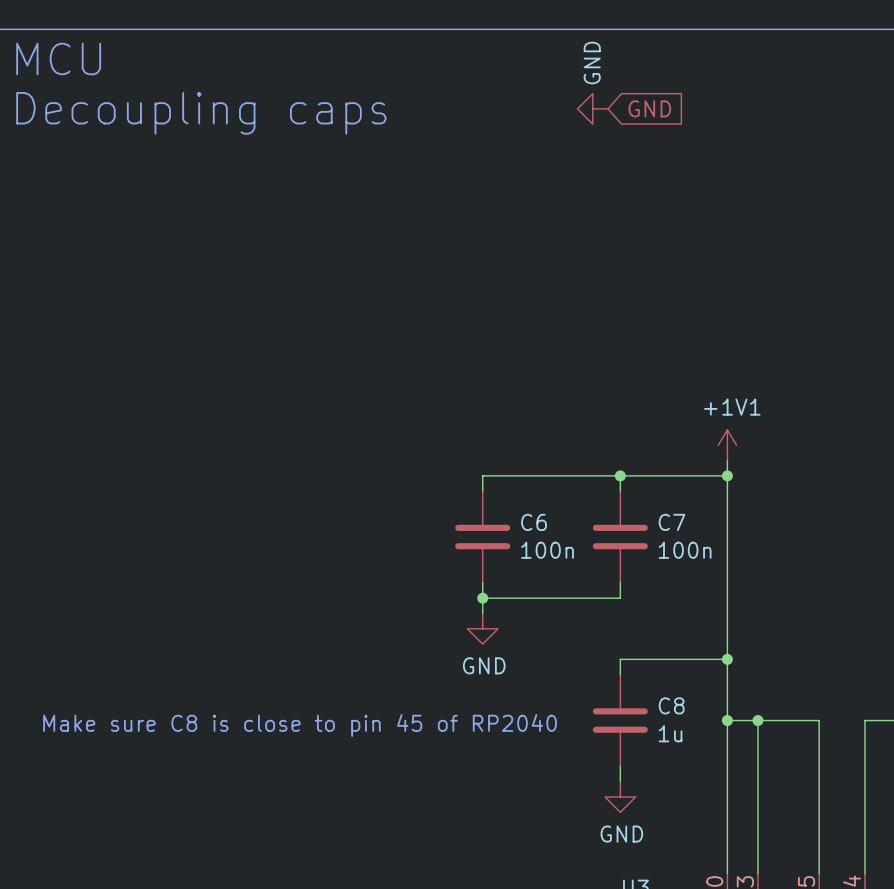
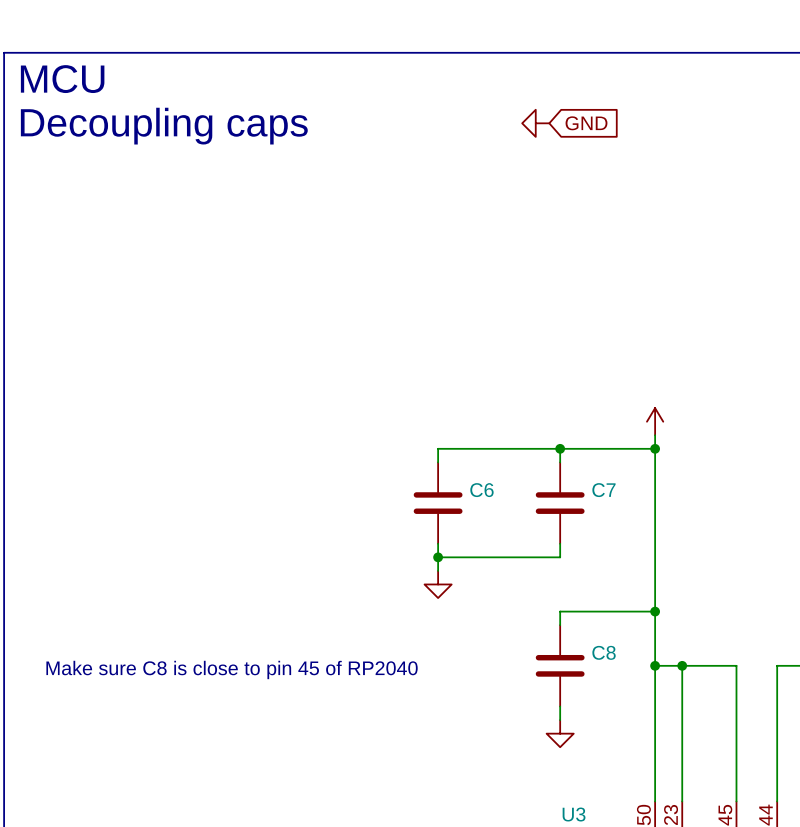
power symbol text: GND (592, 62) -> none
power symbol text: +1V1 (732, 407) -> none
C6 value: 100n (547, 550) -> none
C7 value: 100n (685, 550) -> none
power symbol text: GND (484, 665) -> none
C8 value: 1u (670, 733) -> none
power symbol text: GND (621, 834) -> none

